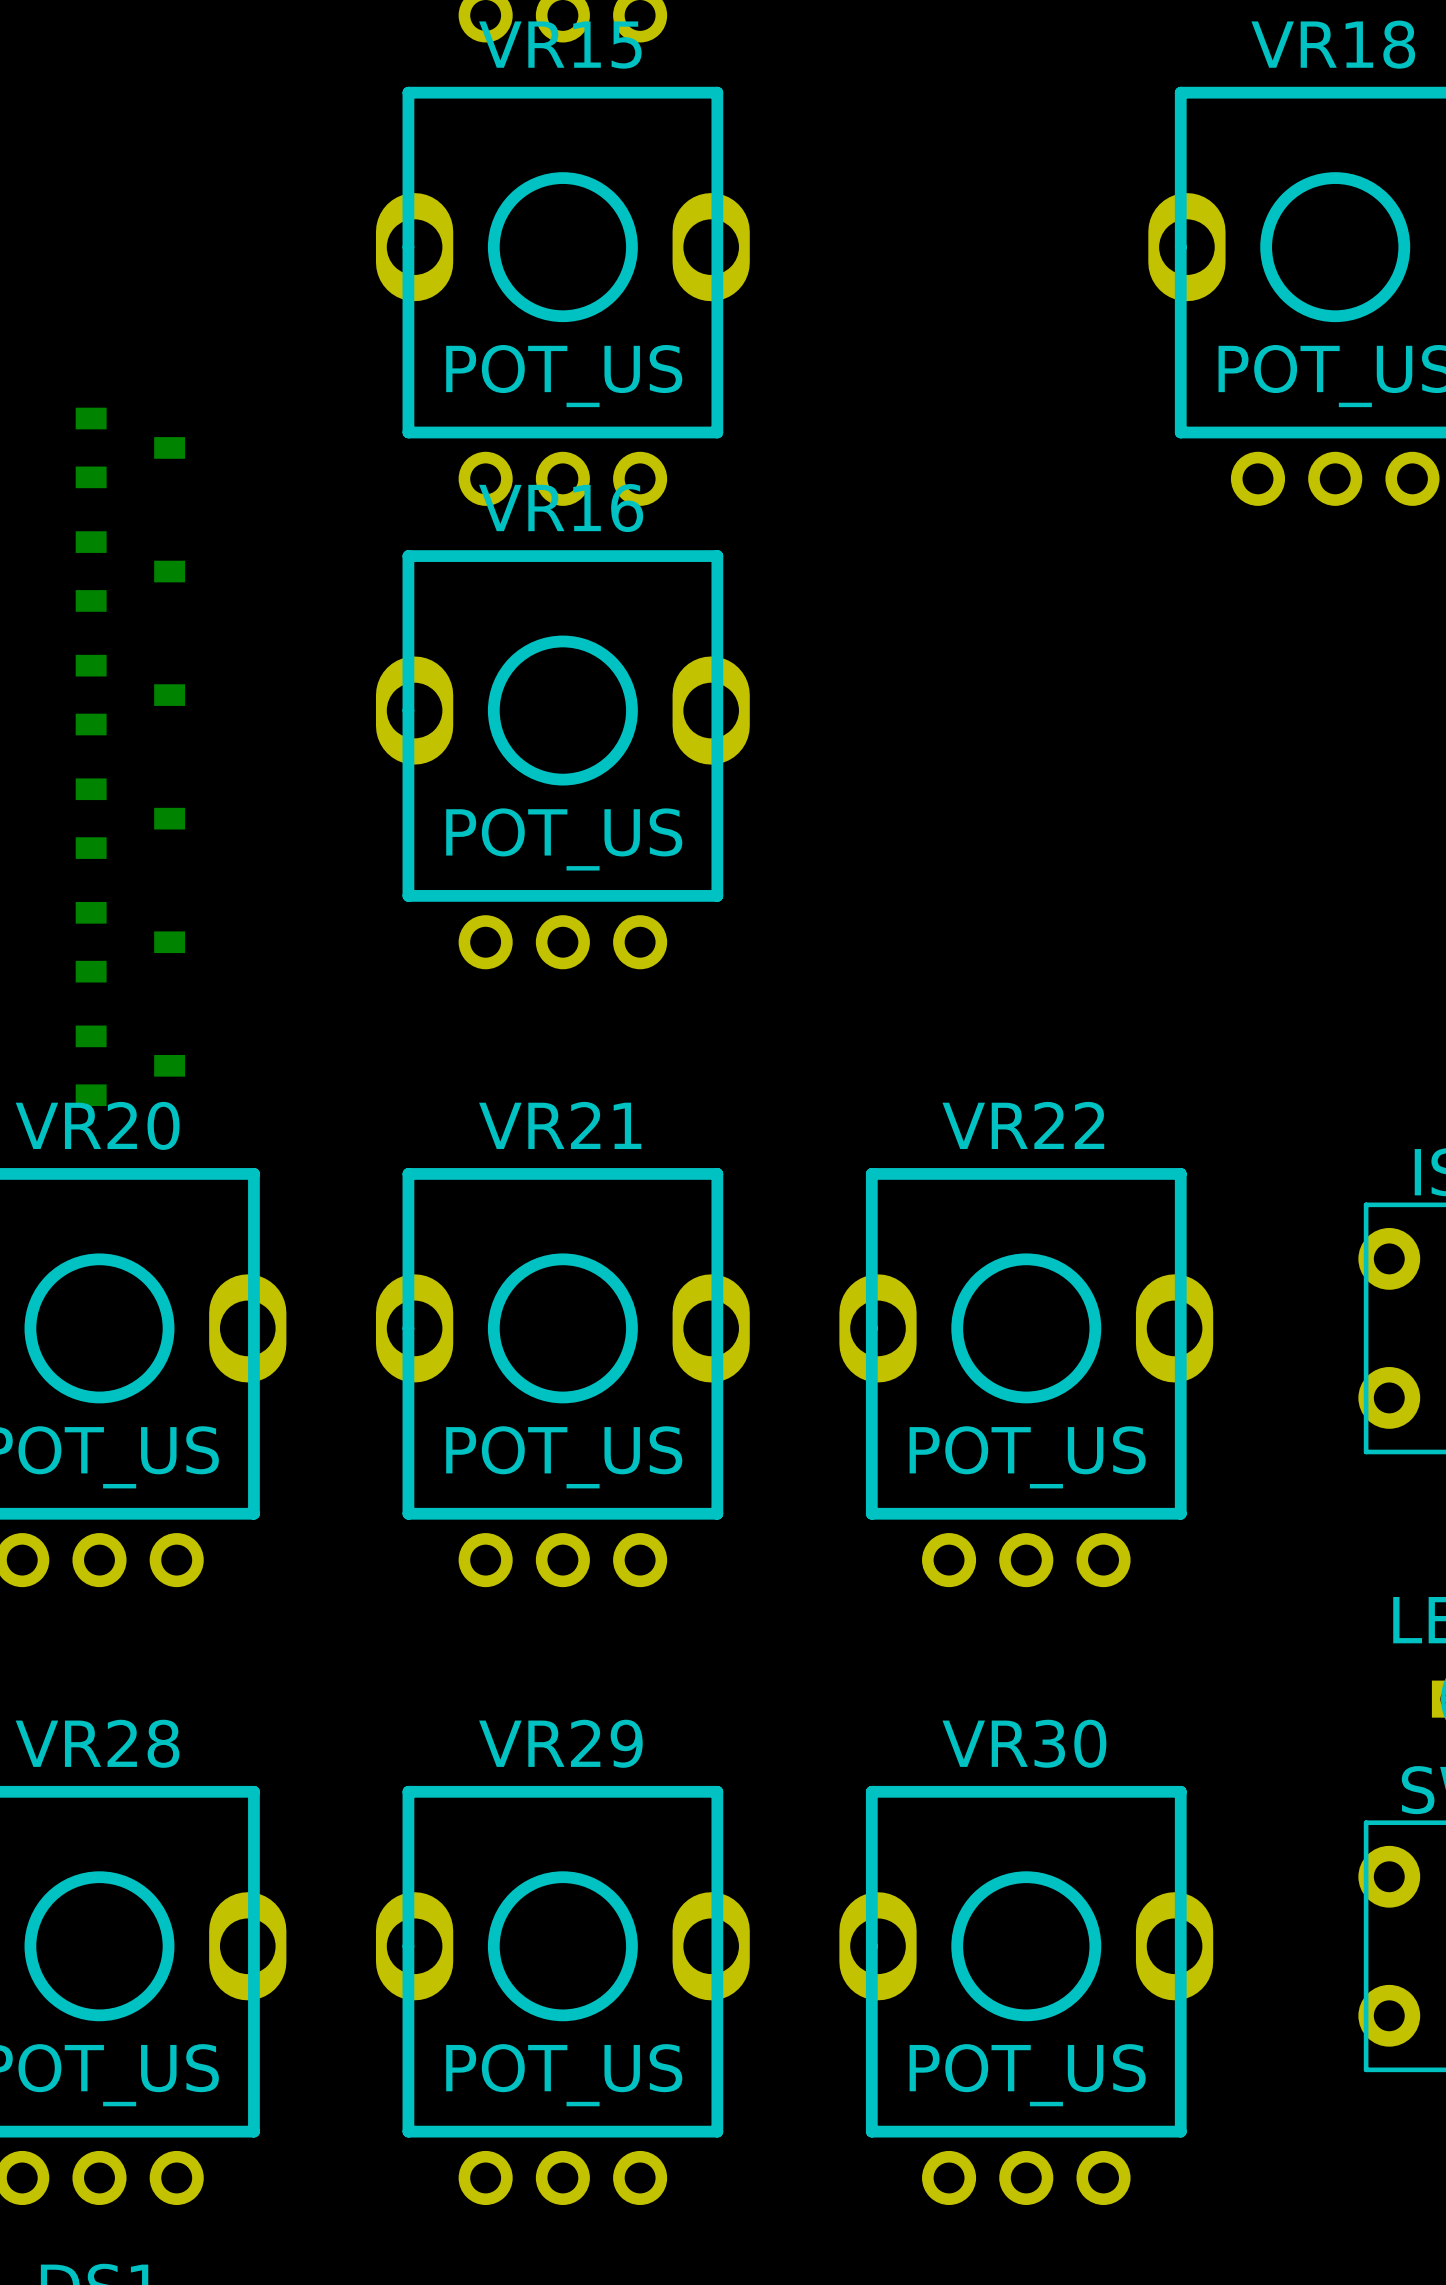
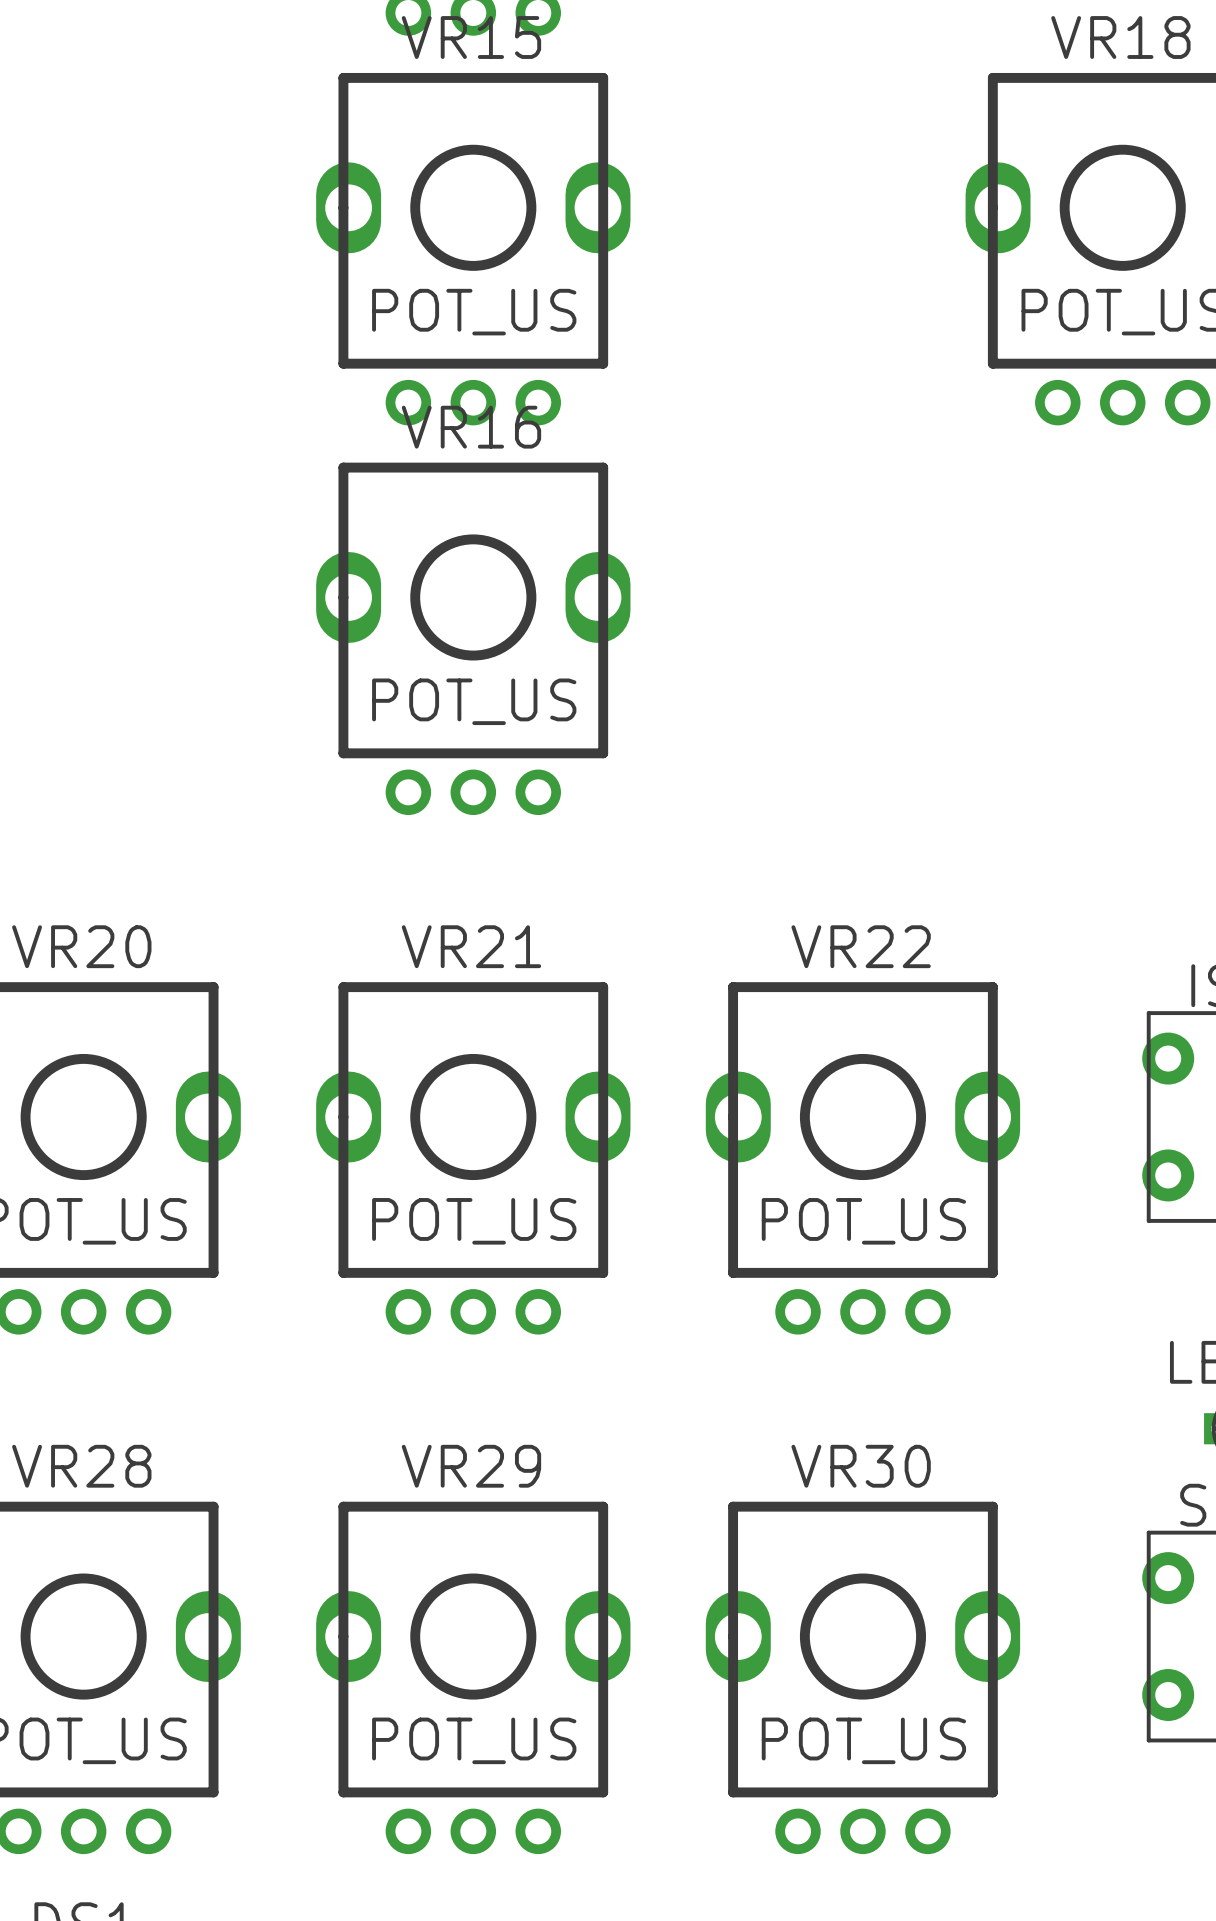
part: (130, 447) -> none
part: (130, 571) -> none
part: (130, 695) -> none
part: (130, 818) -> none
part: (130, 942) -> none
part: (130, 1065) -> none

